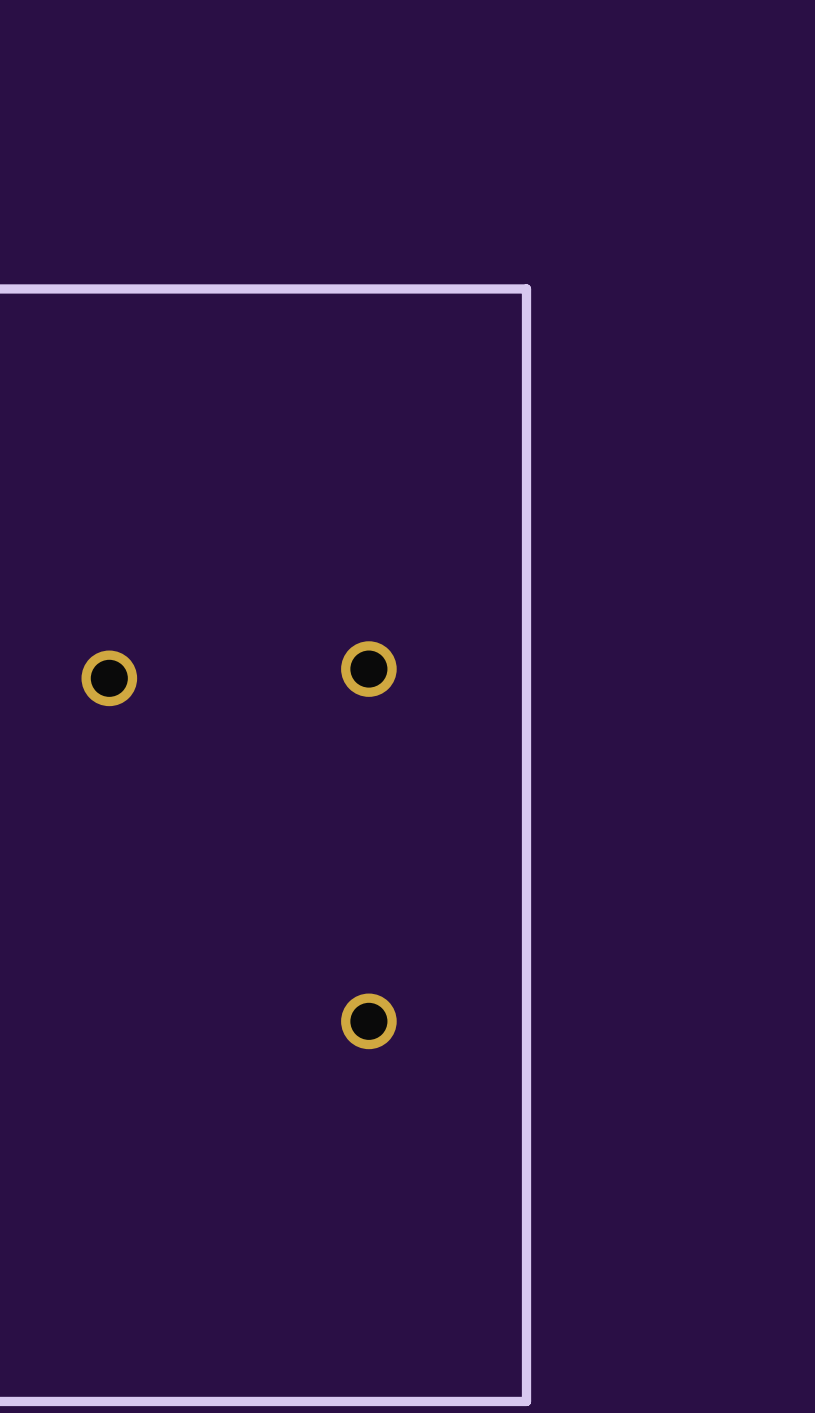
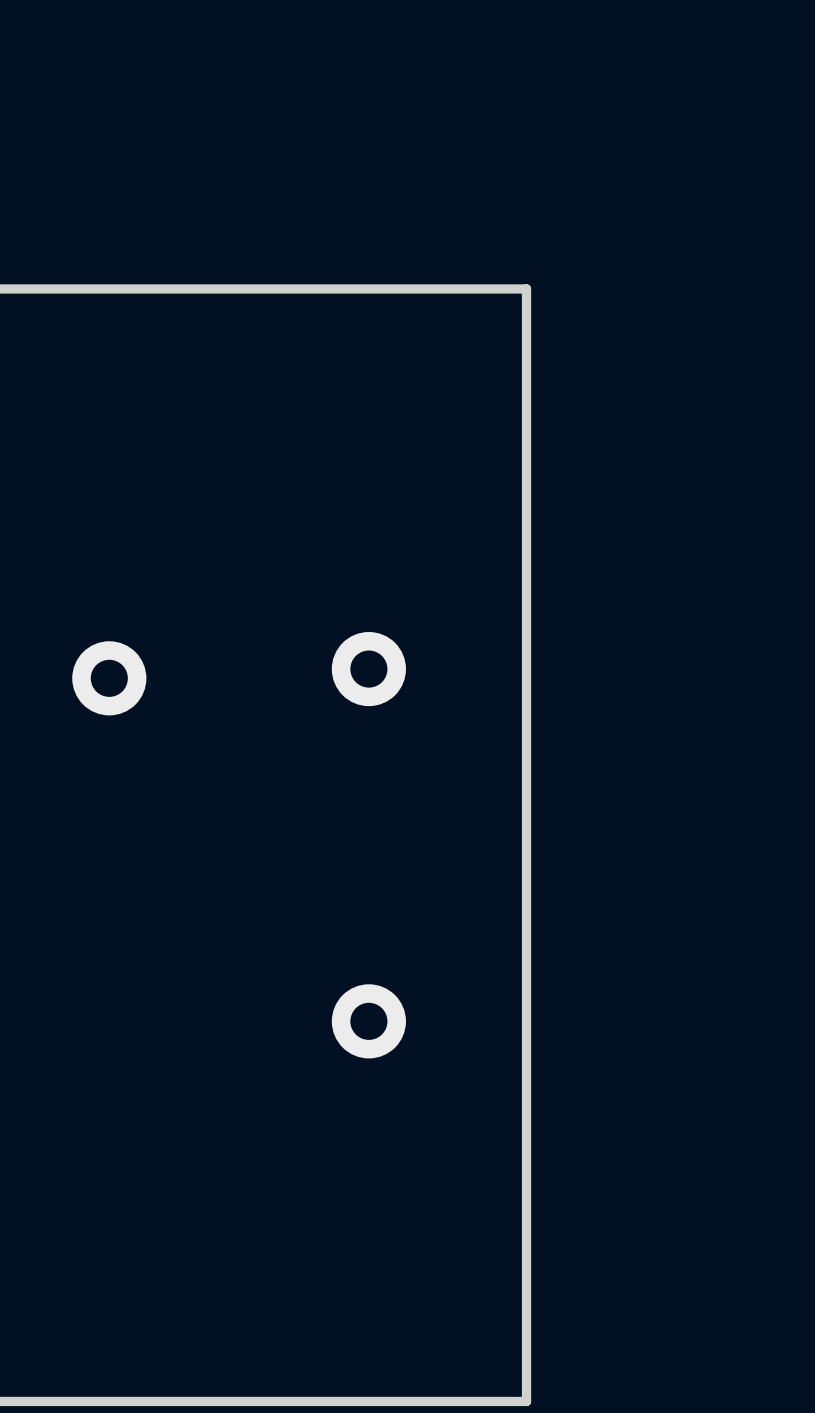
via size: [341, 641, 397, 697] -> [331, 631, 406, 707]
via size: [81, 650, 138, 707] -> [72, 641, 147, 716]
via size: [341, 993, 397, 1050] -> [331, 984, 406, 1059]

